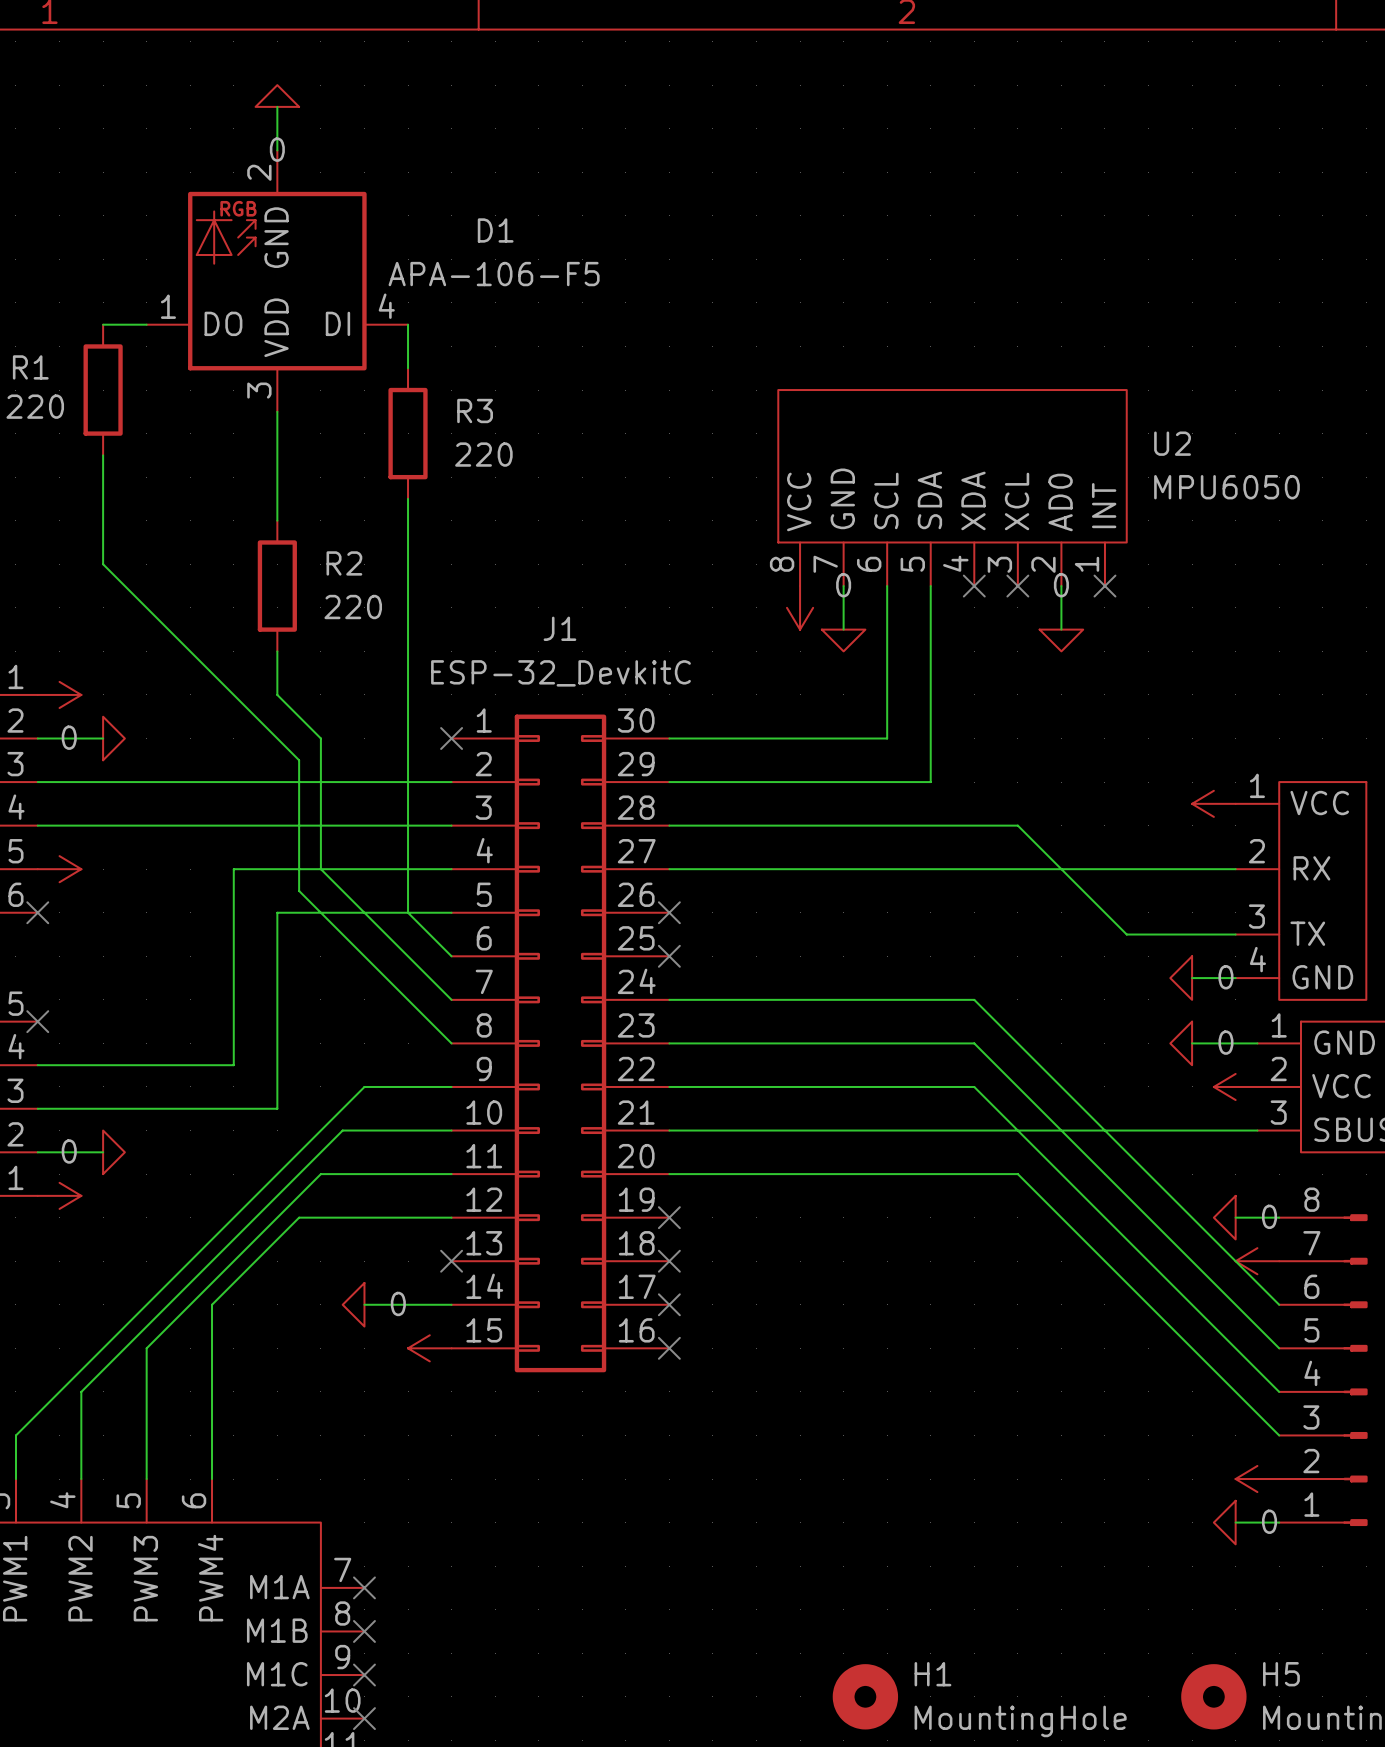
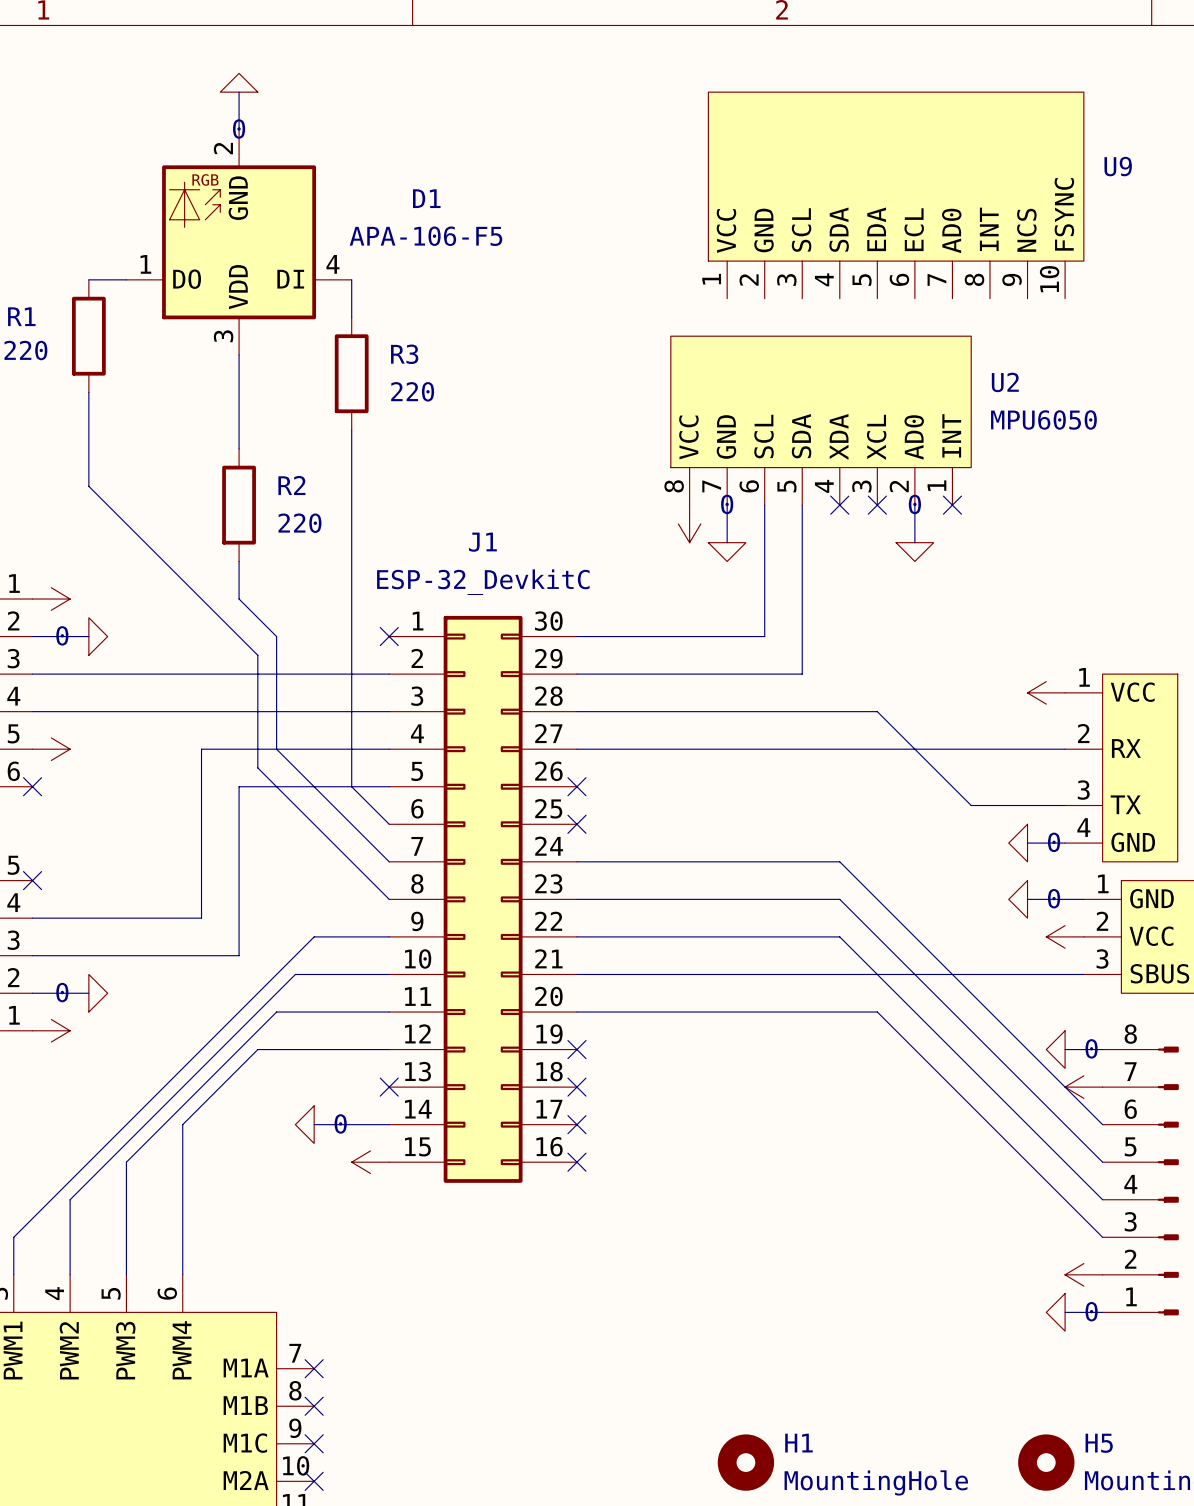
U9: none -> (896, 195)

